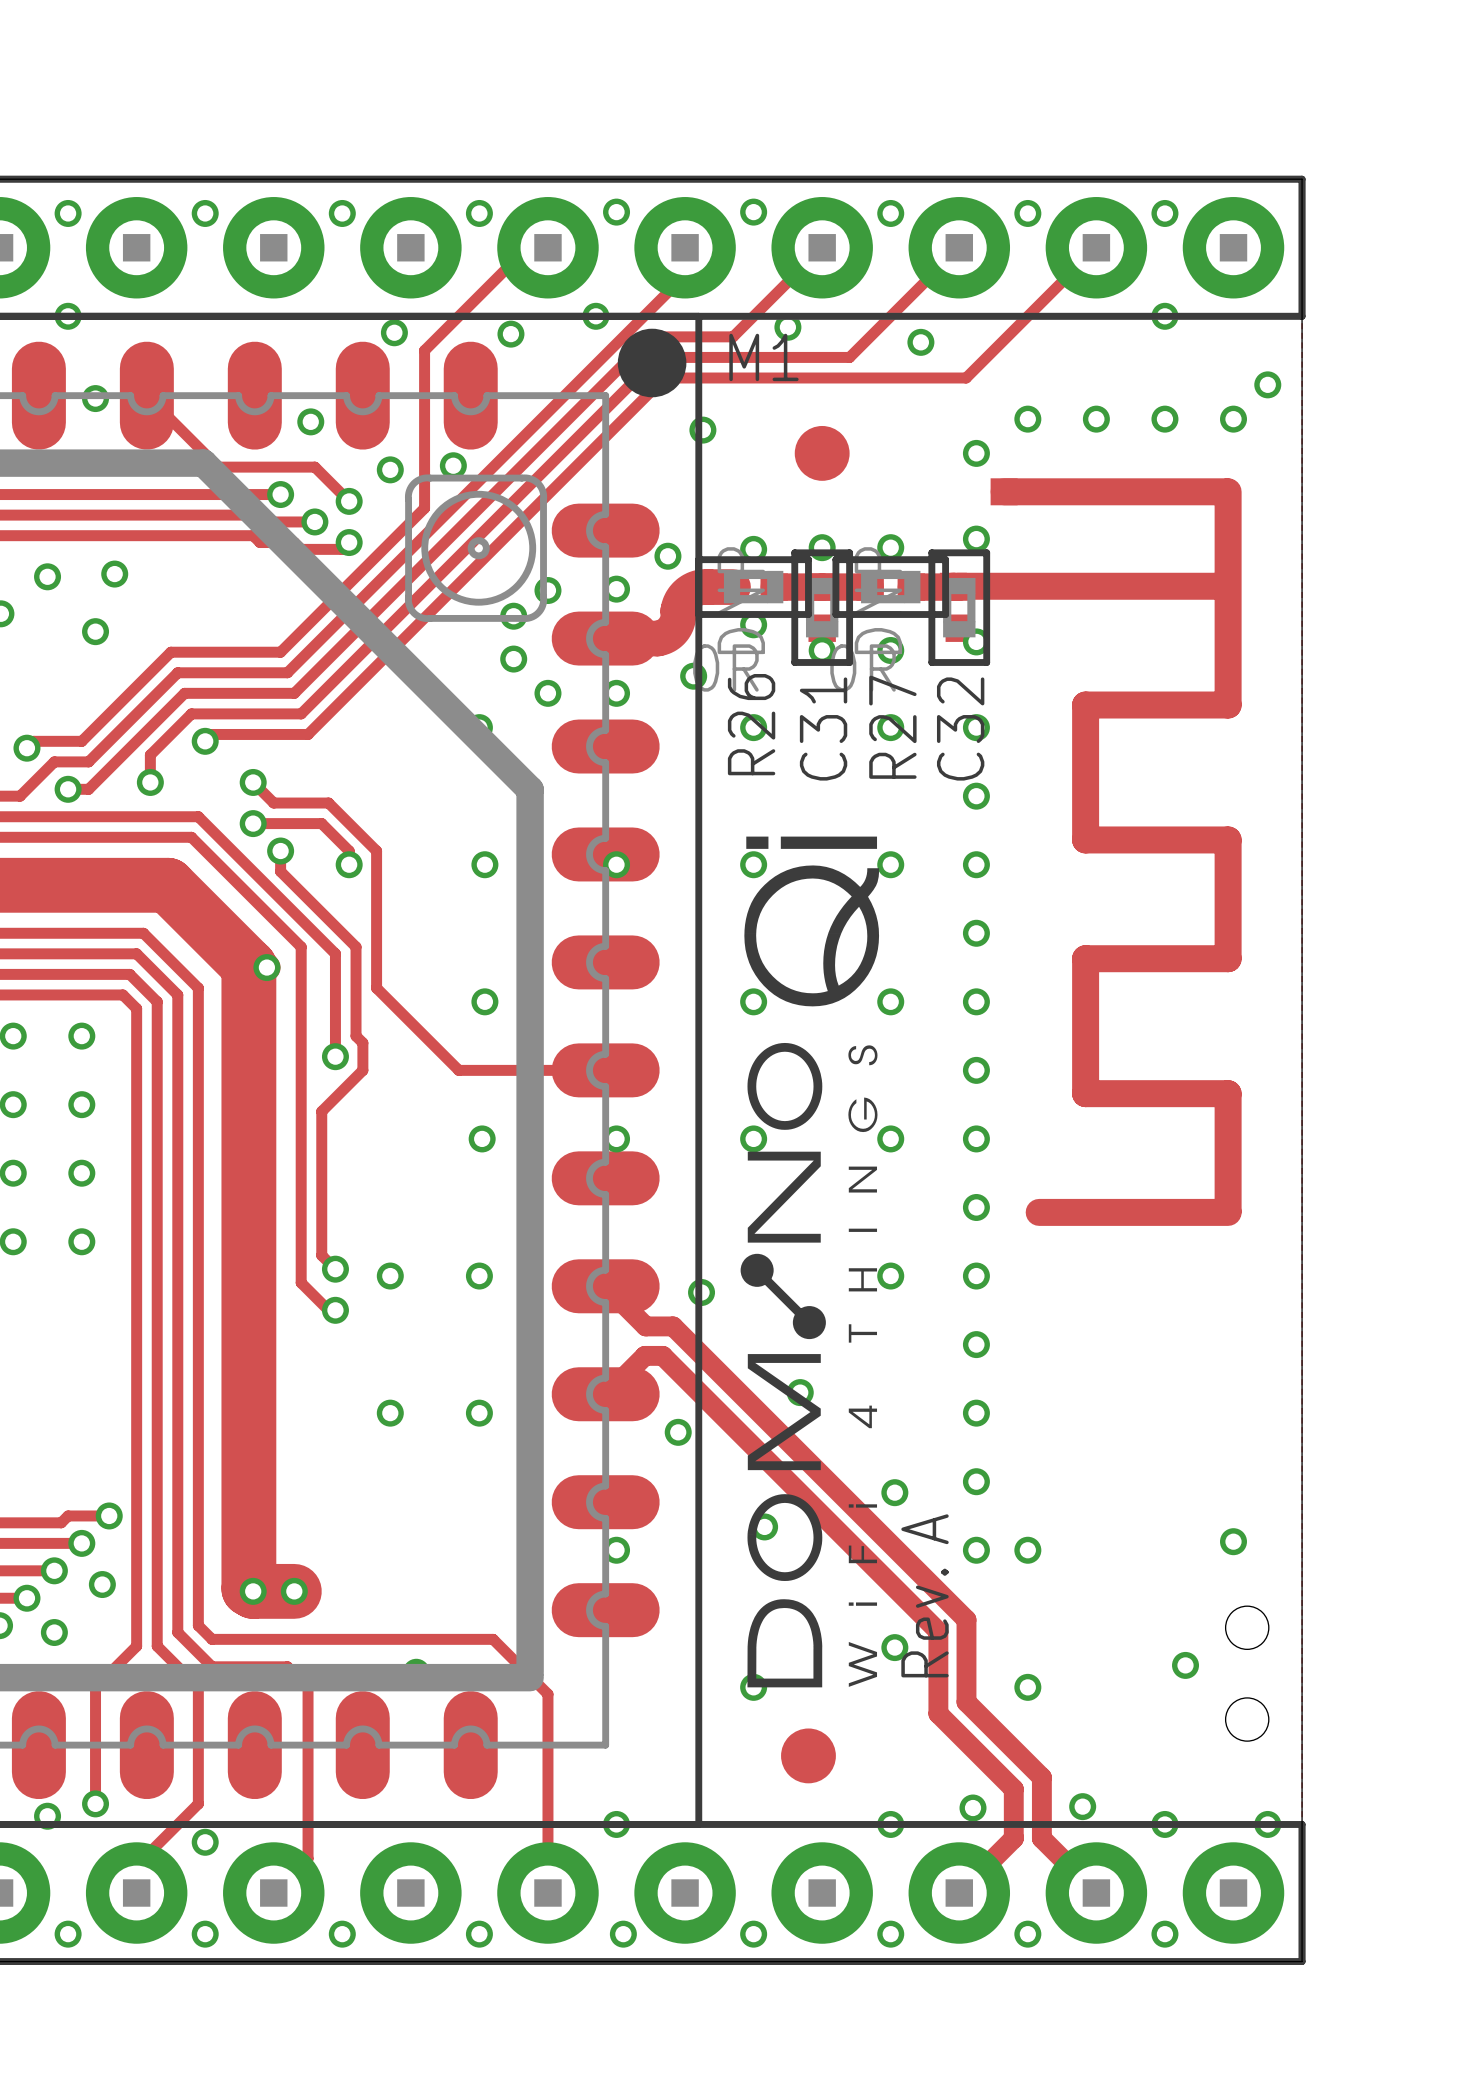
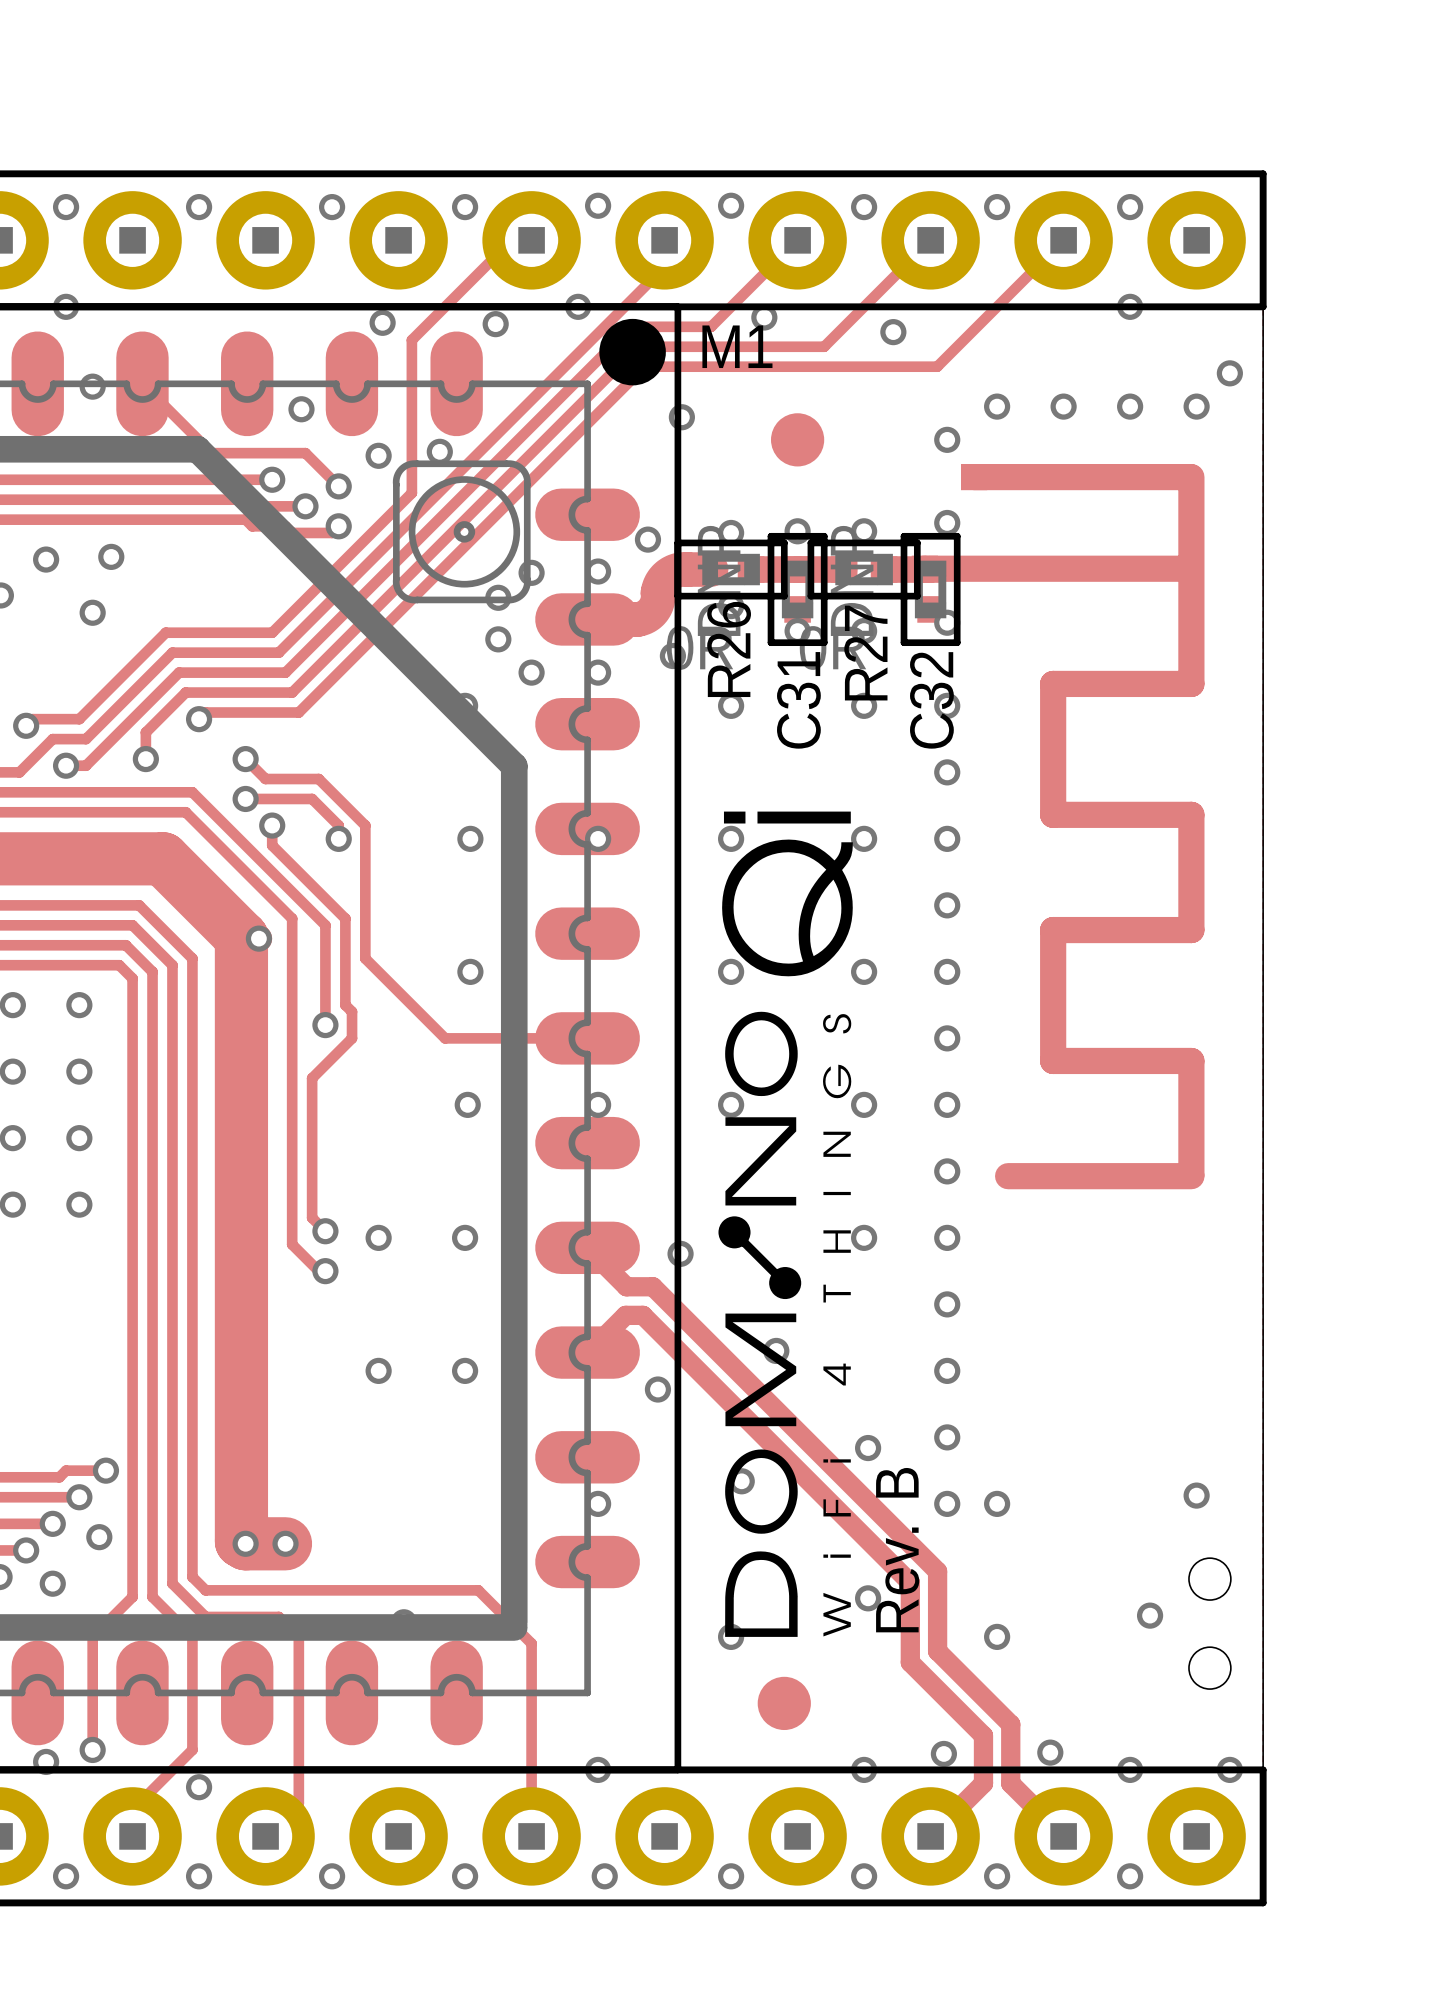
R26 name position: R26 (751, 724) -> R26 (729, 649)
R27 name position: R27 (892, 727) -> R27 (865, 653)
text: A (925, 1529) -> B (897, 1482)

